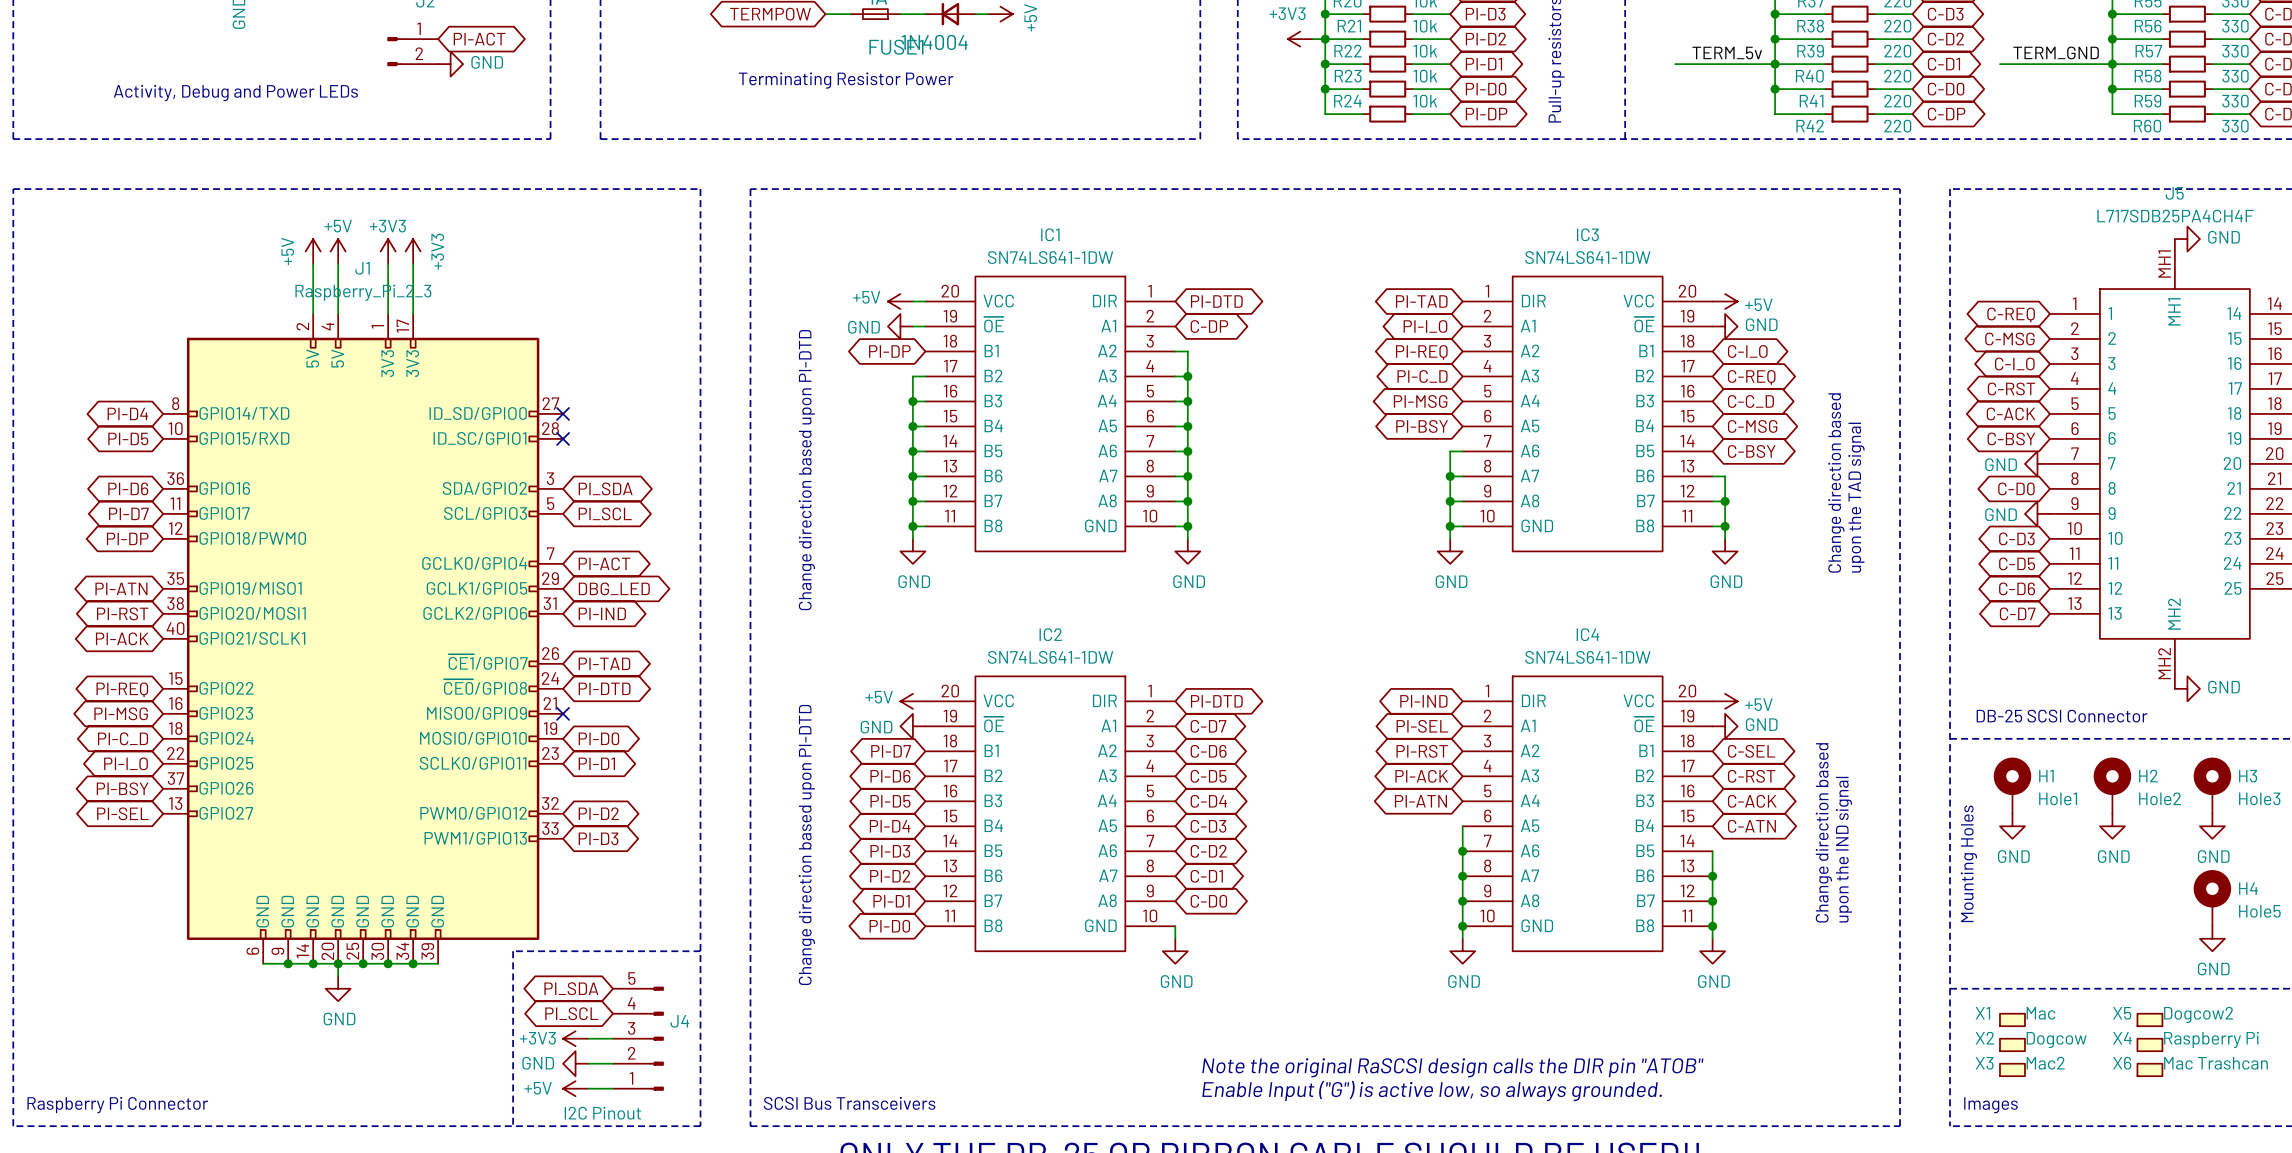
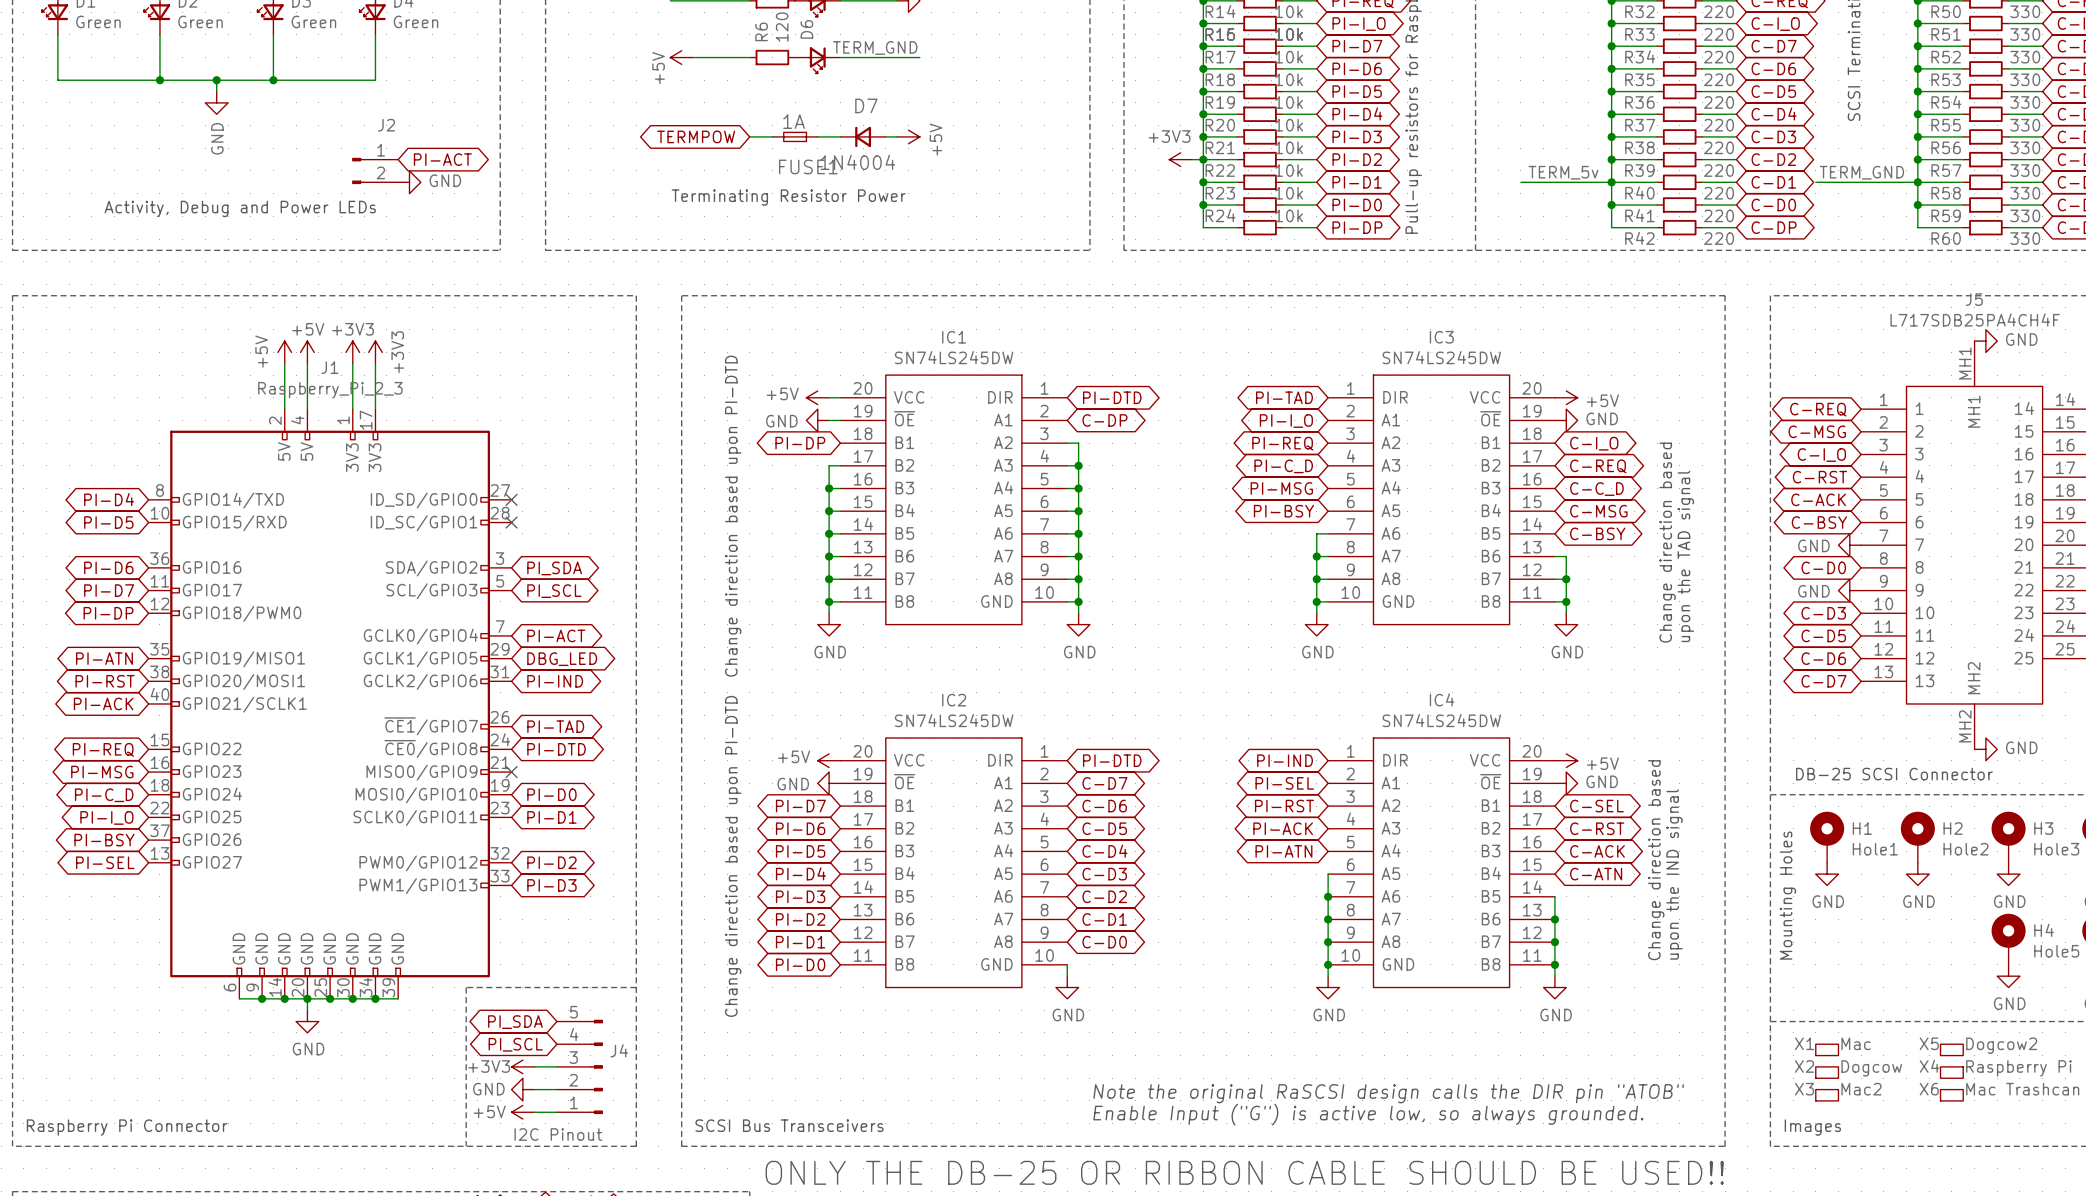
IC1 value: SN74LS641-1DW (1050, 257) -> SN74LS245DW (954, 357)
IC3 value: SN74LS641-1DW (1587, 257) -> SN74LS245DW (1441, 357)
IC2 value: SN74LS641-1DW (1050, 657) -> SN74LS245DW (954, 720)
IC4 value: SN74LS641-1DW (1587, 657) -> SN74LS245DW (1441, 720)

